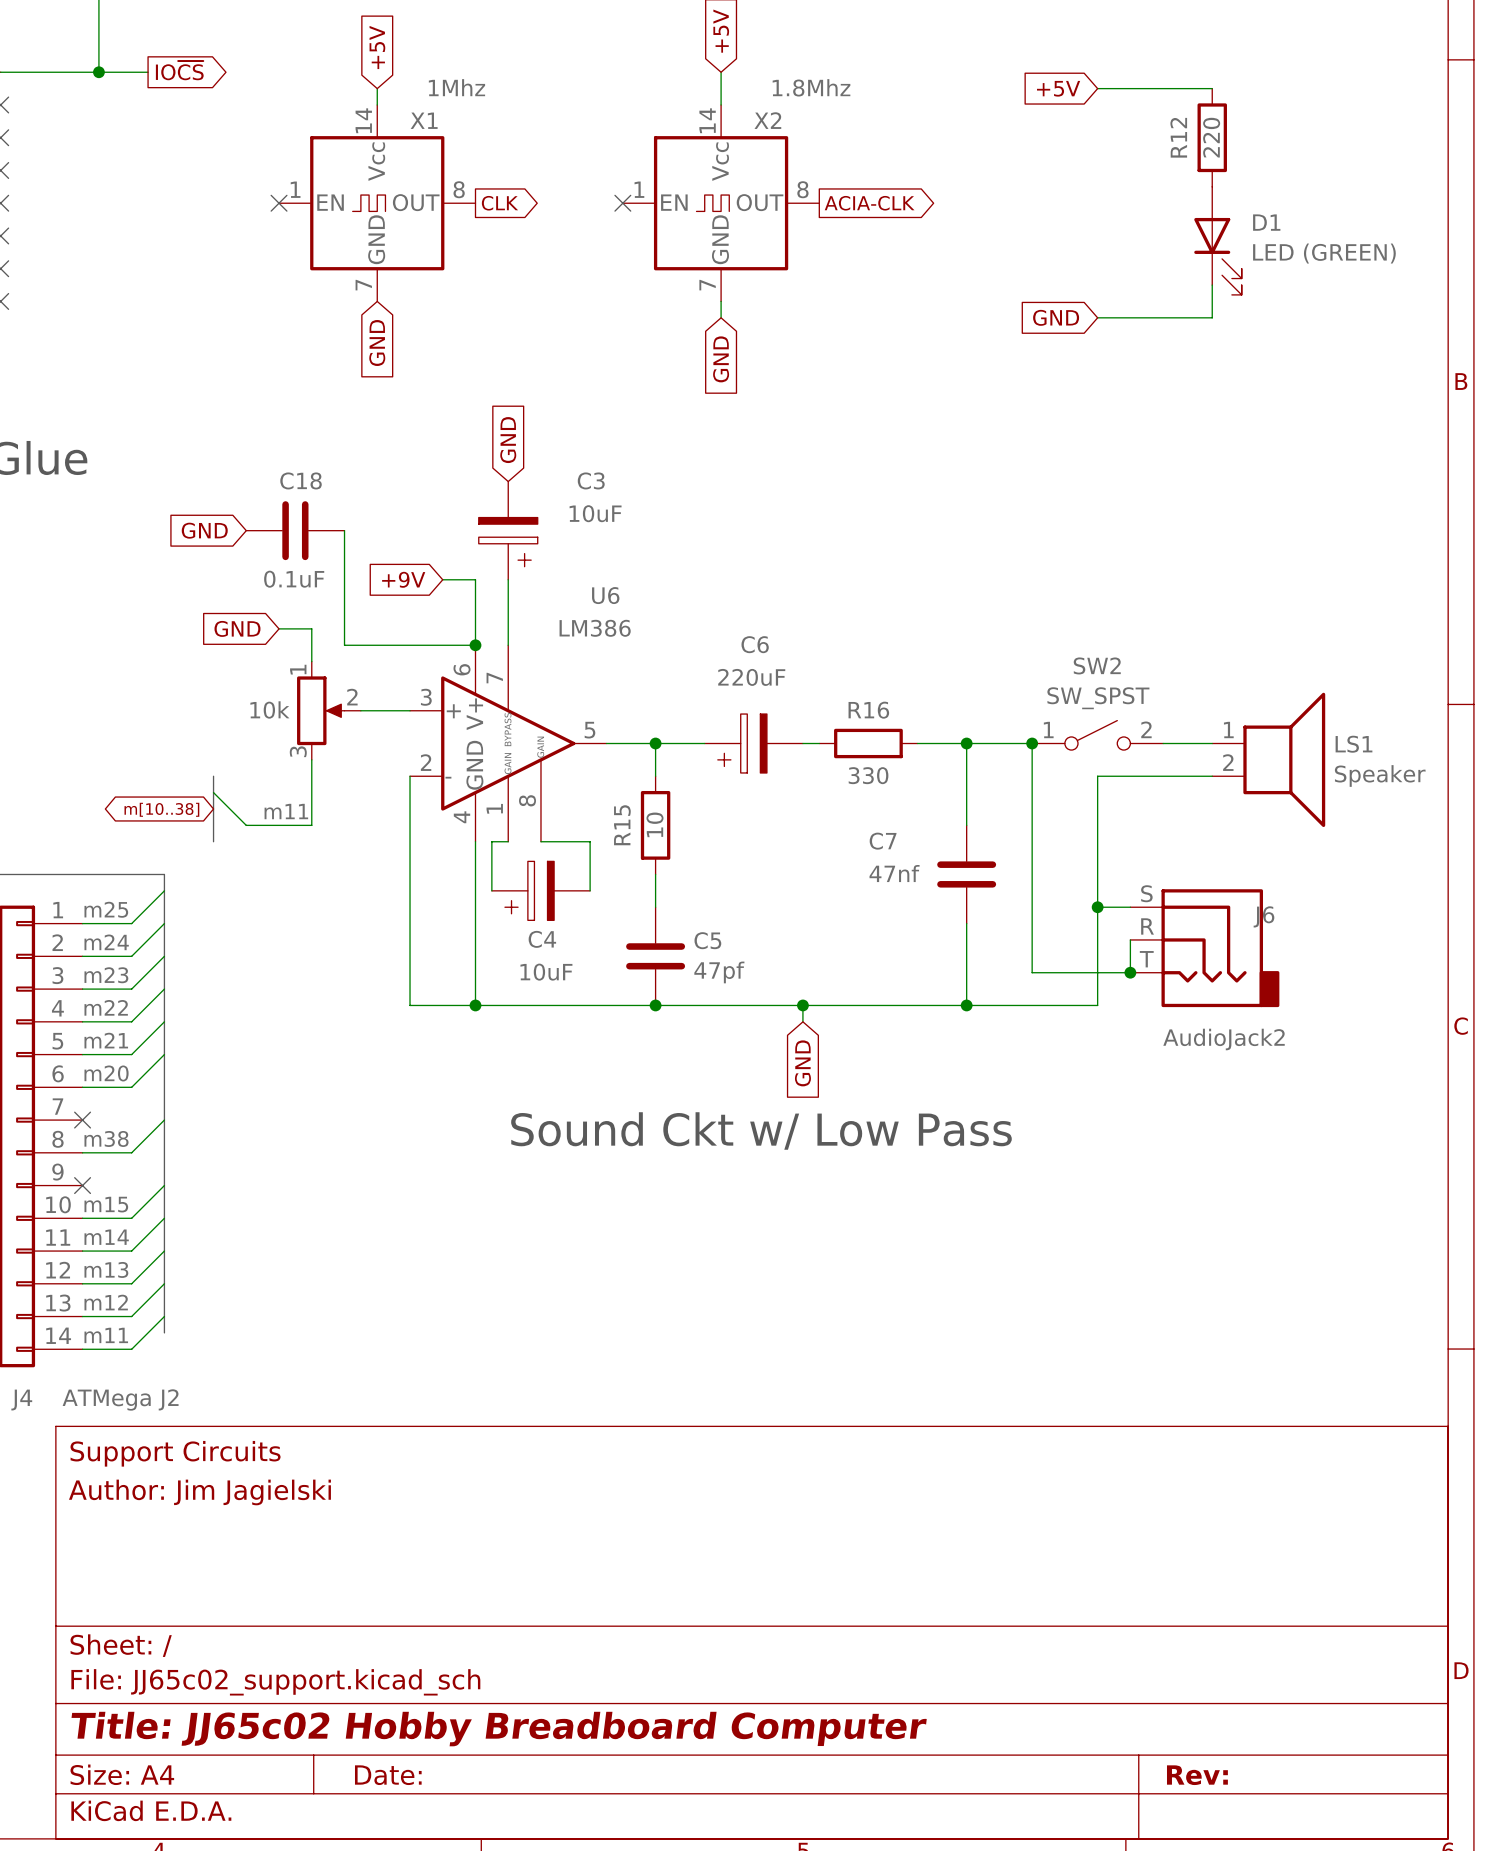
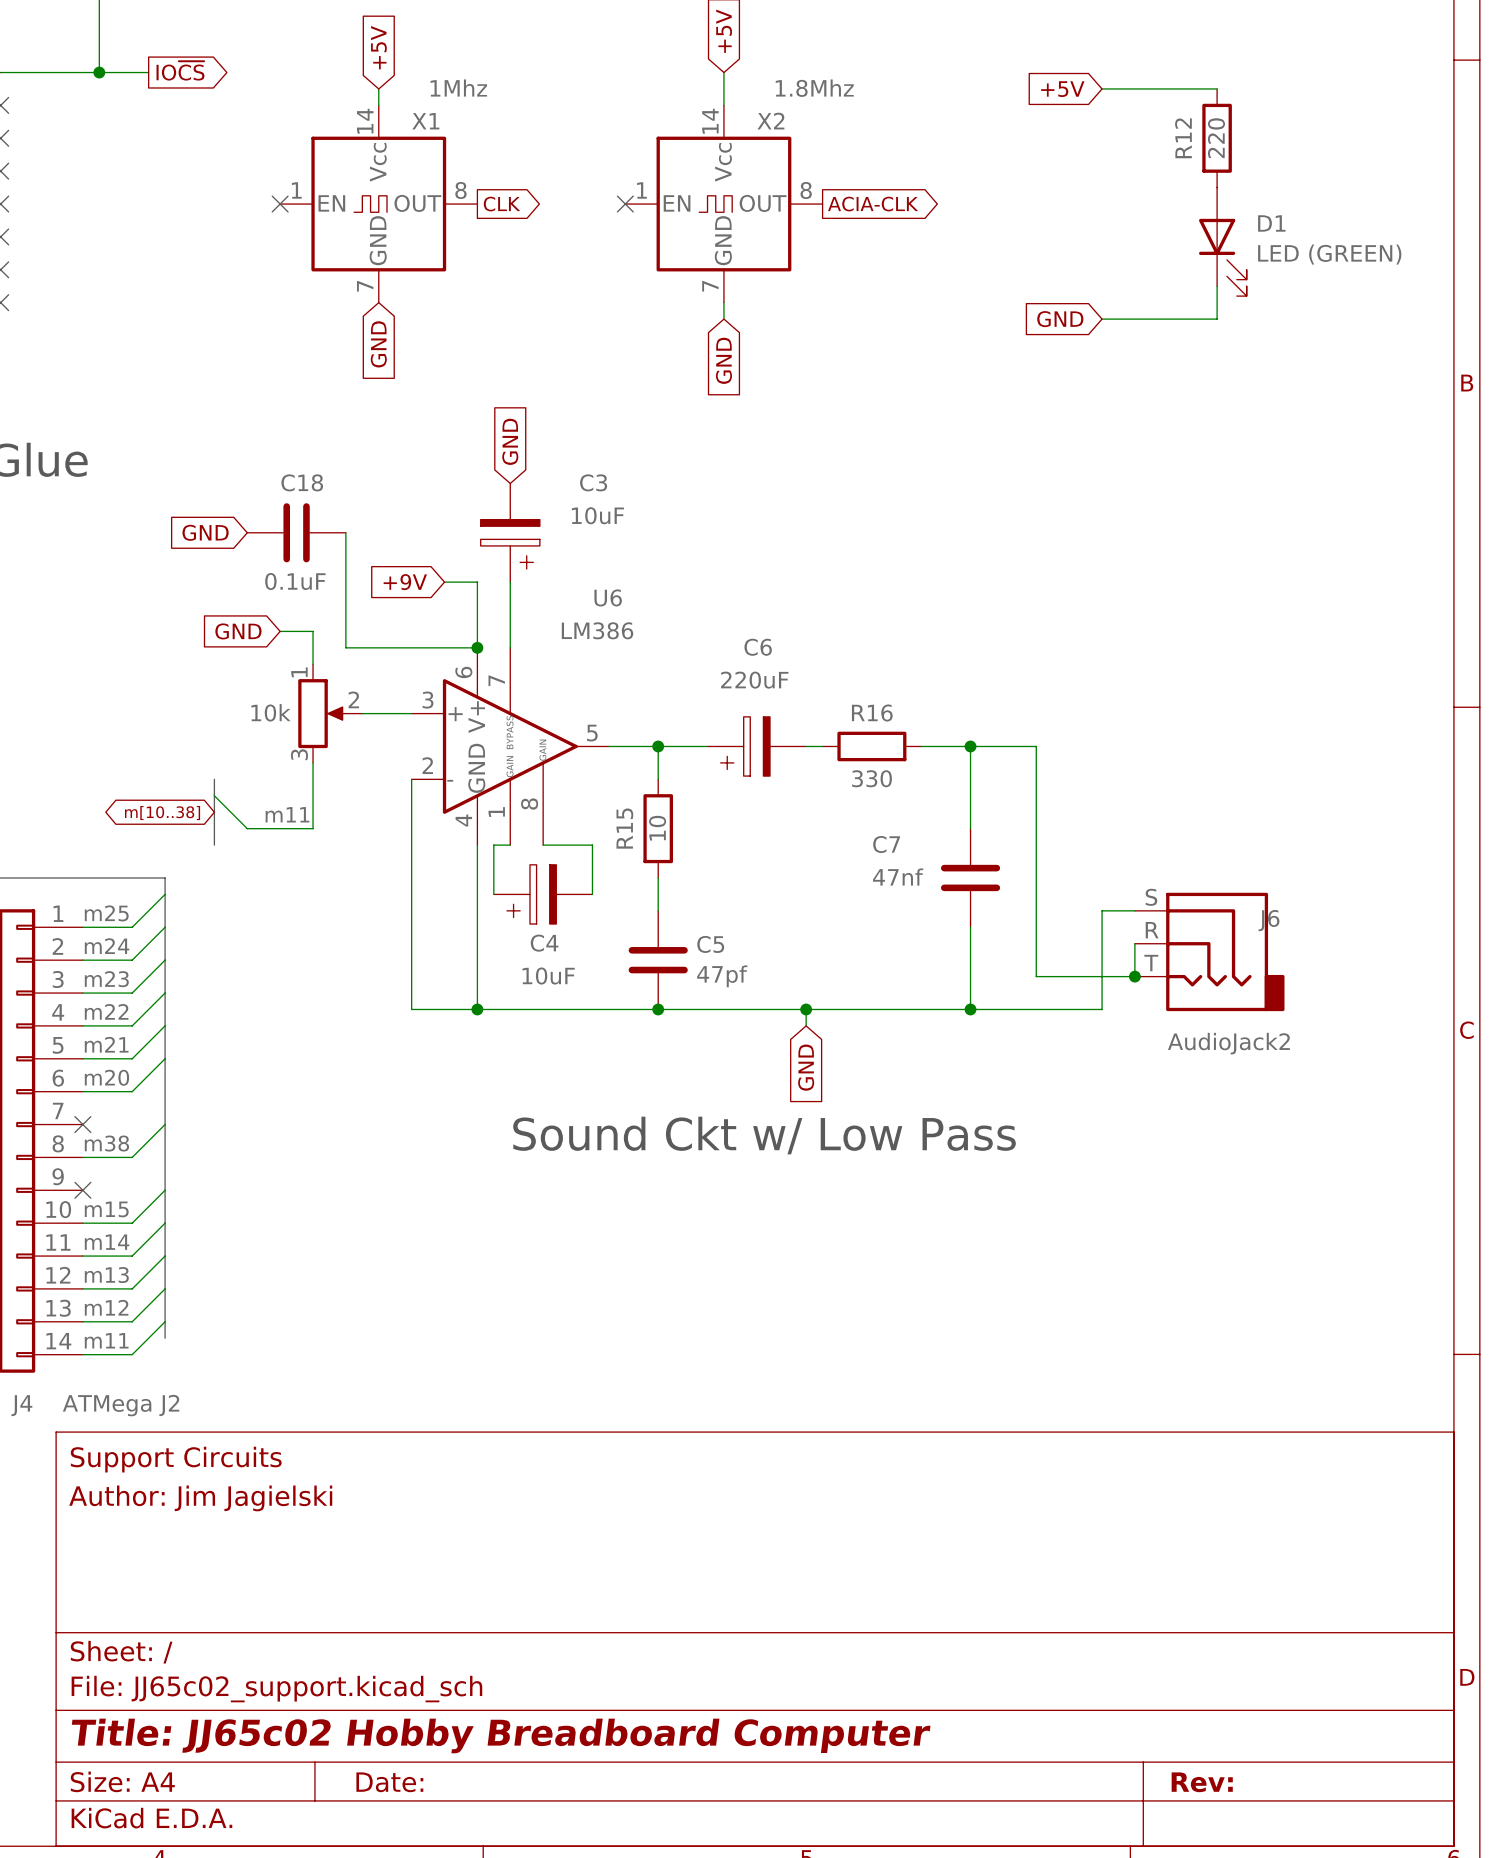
SW2: SW_SPST (1097, 735) -> none
junction: (1032, 743) -> none
wire: (1163, 743) (1212, 743) -> none
LS1: Speaker (1268, 759) -> none
wire: (1212, 776) (1097, 776) (1097, 907) -> none
junction: (1097, 907) -> none

